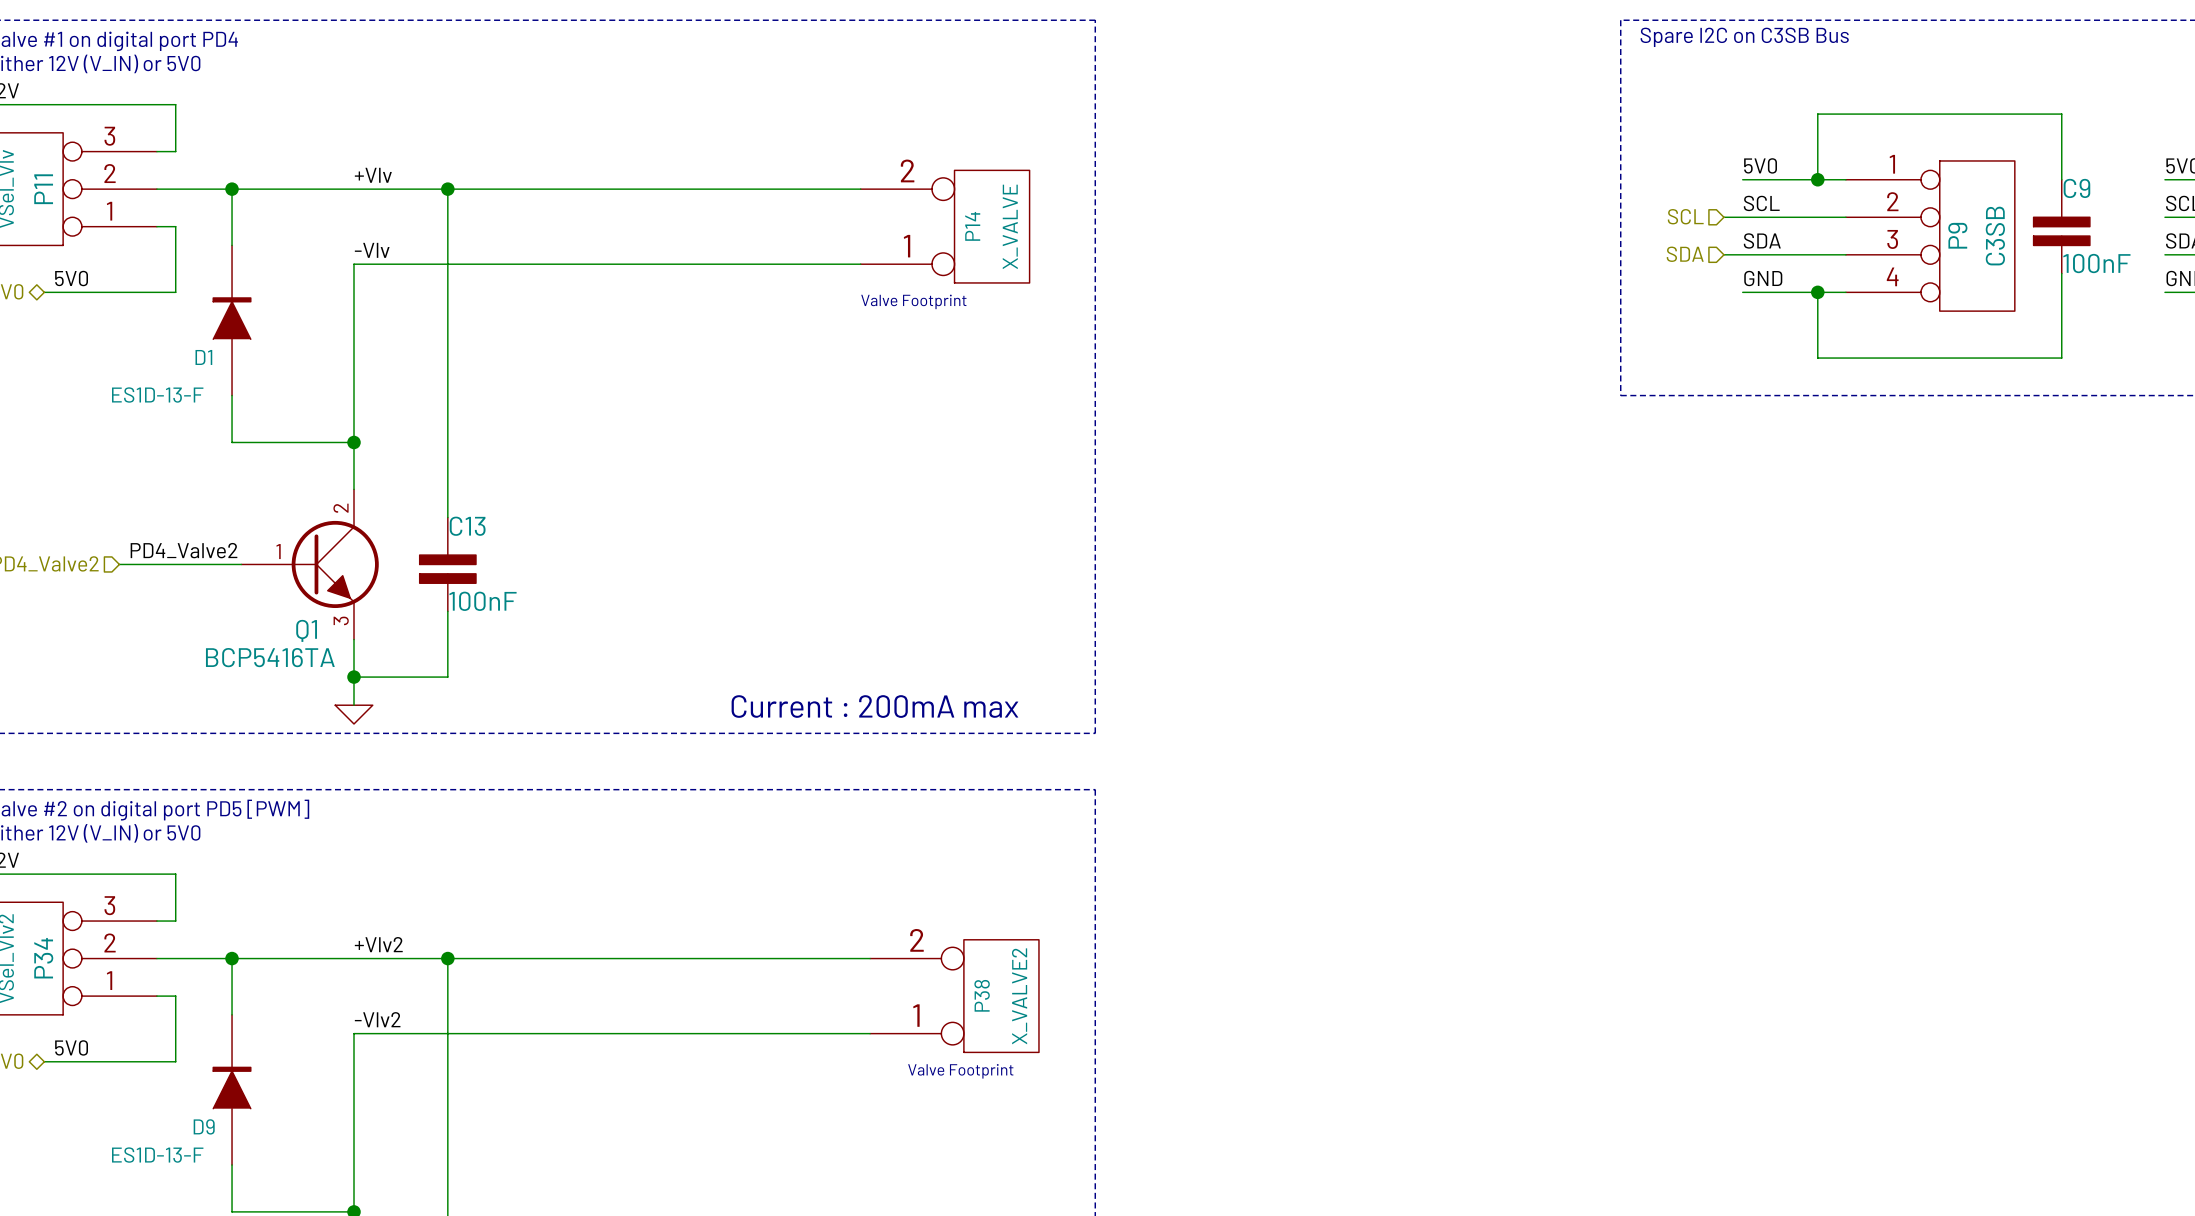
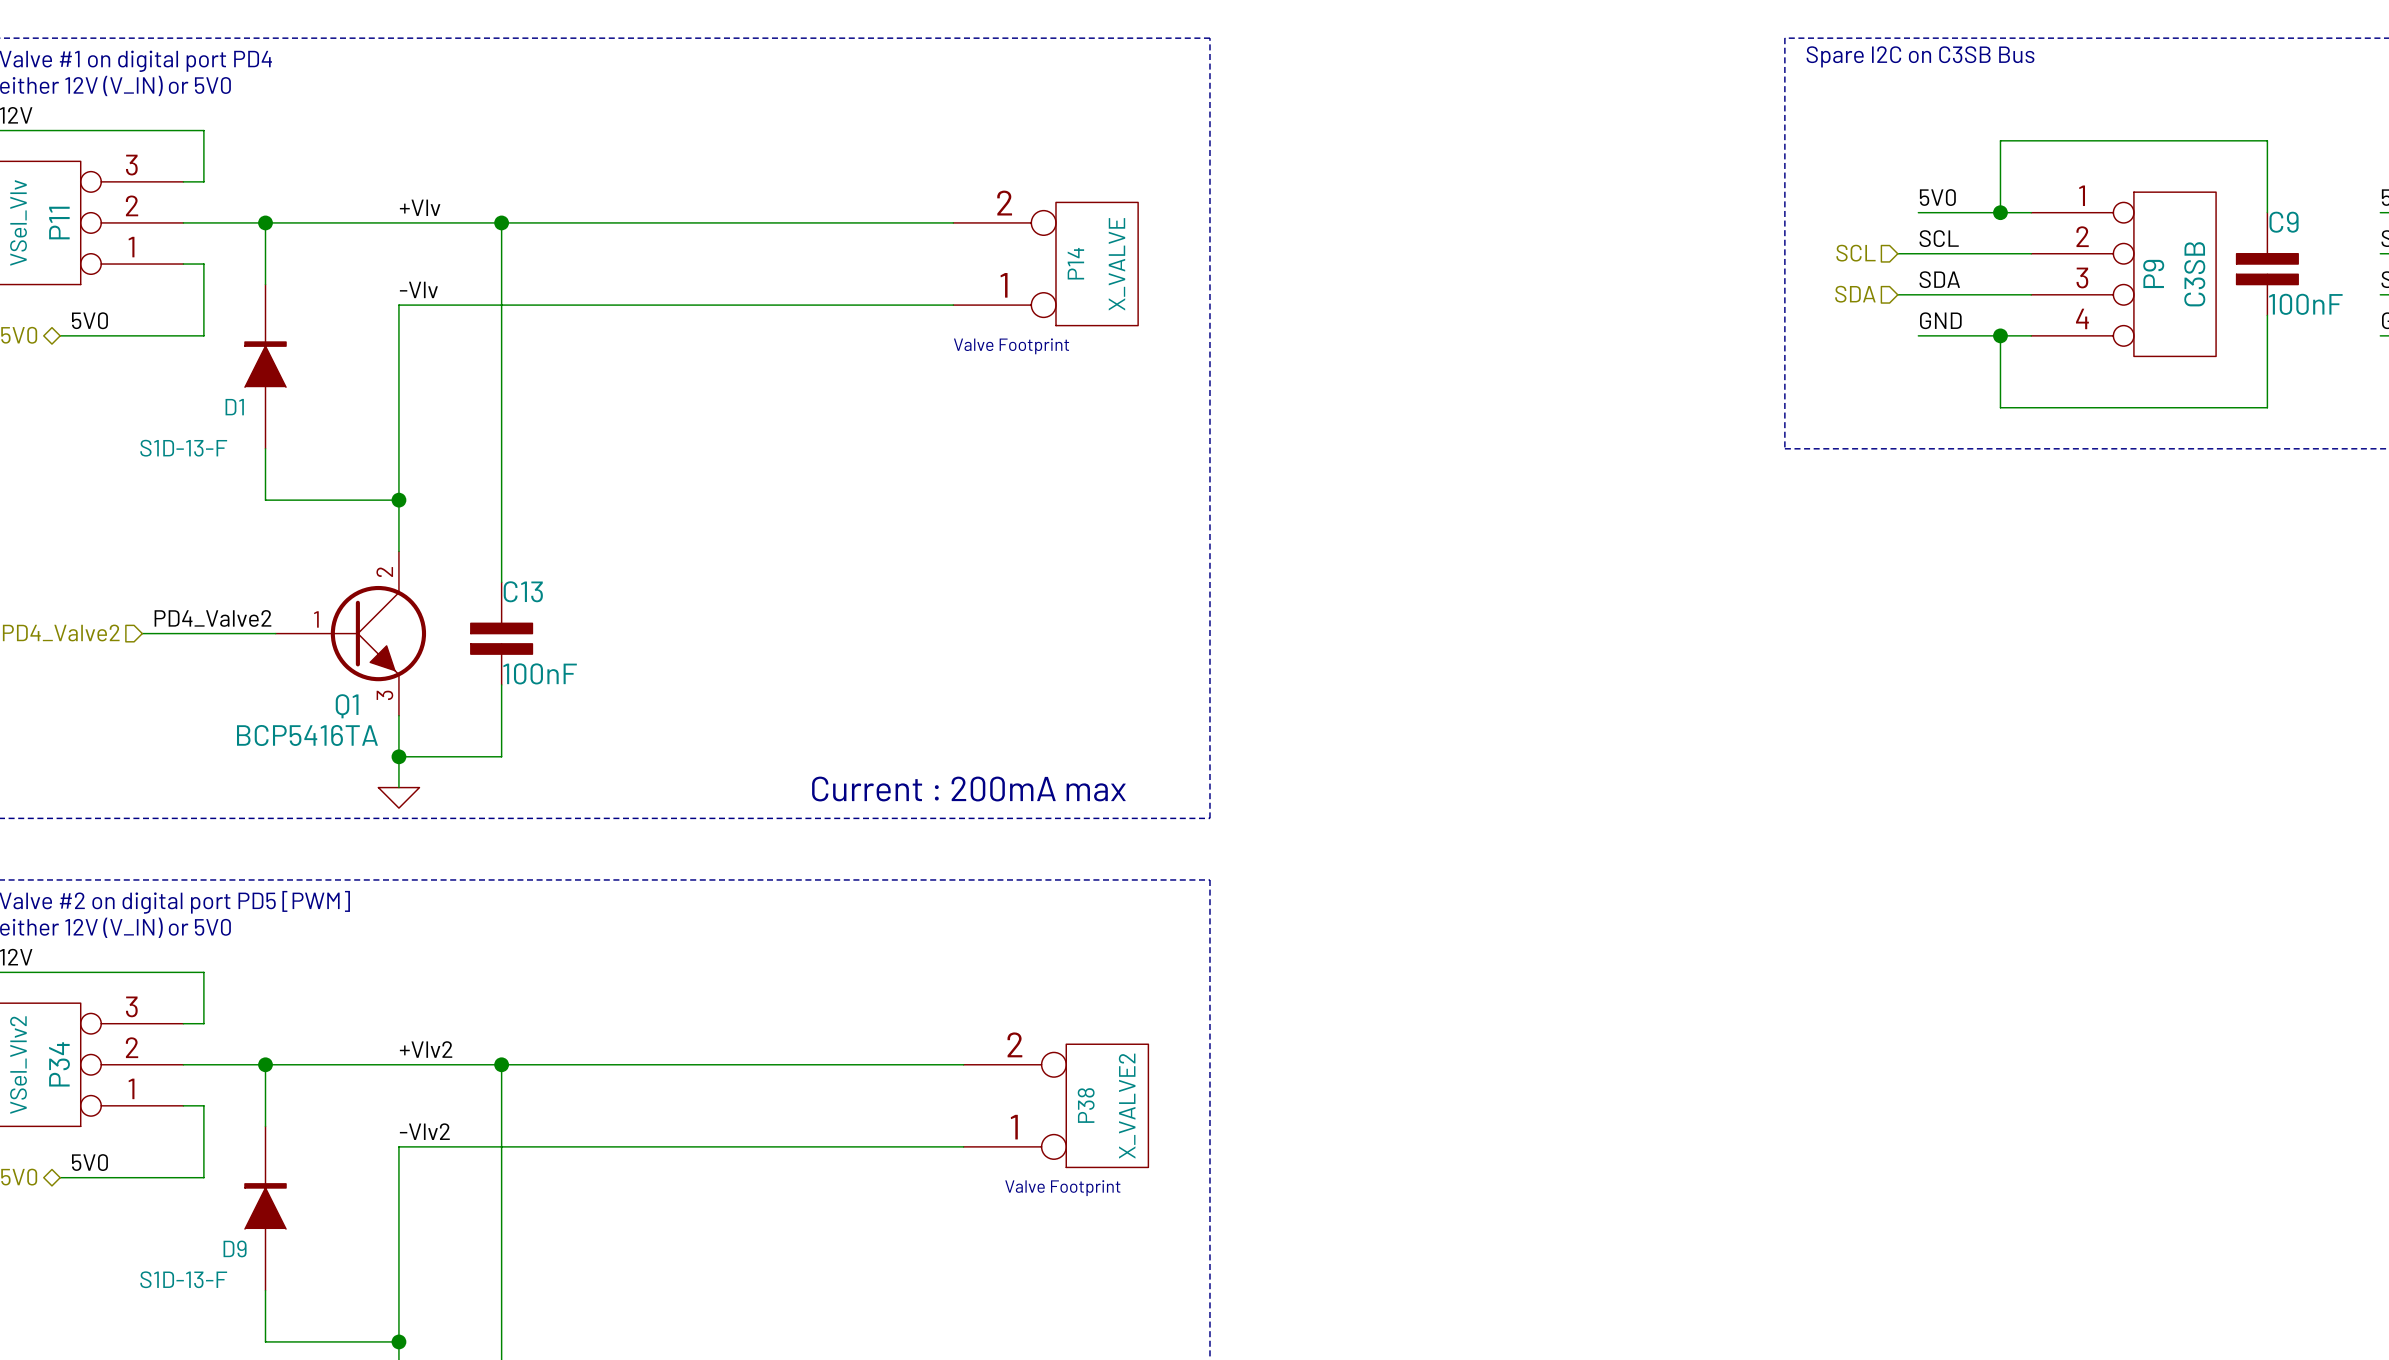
D1 value: ES1D-13-F (157, 395) -> S1D-13-F (183, 448)
D9 value: ES1D-13-F (157, 1155) -> S1D-13-F (183, 1279)

